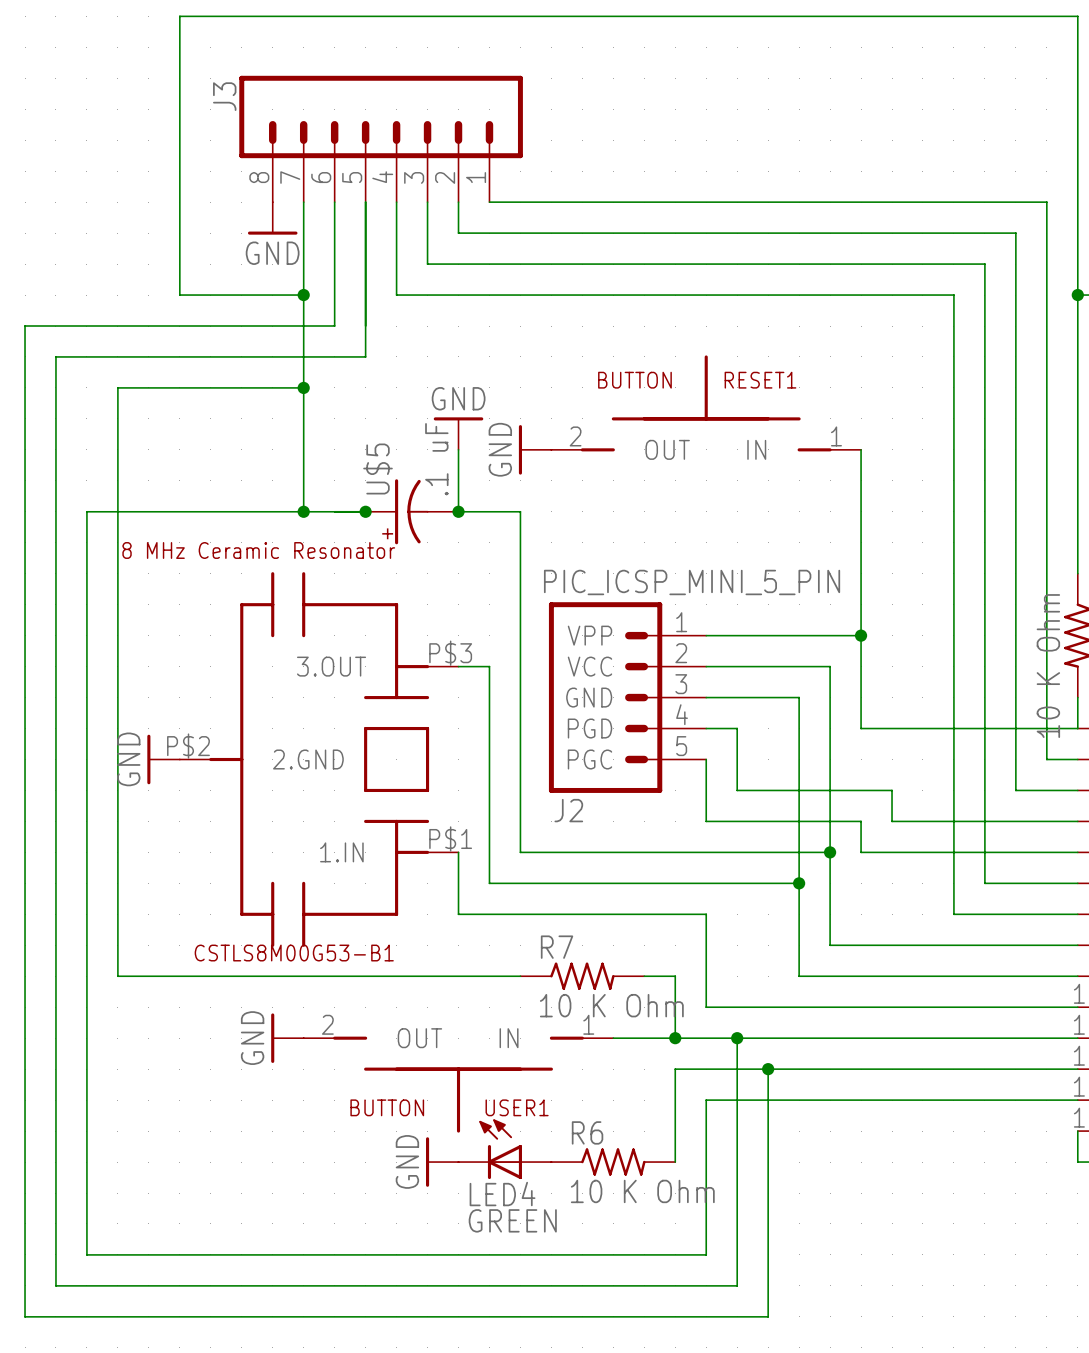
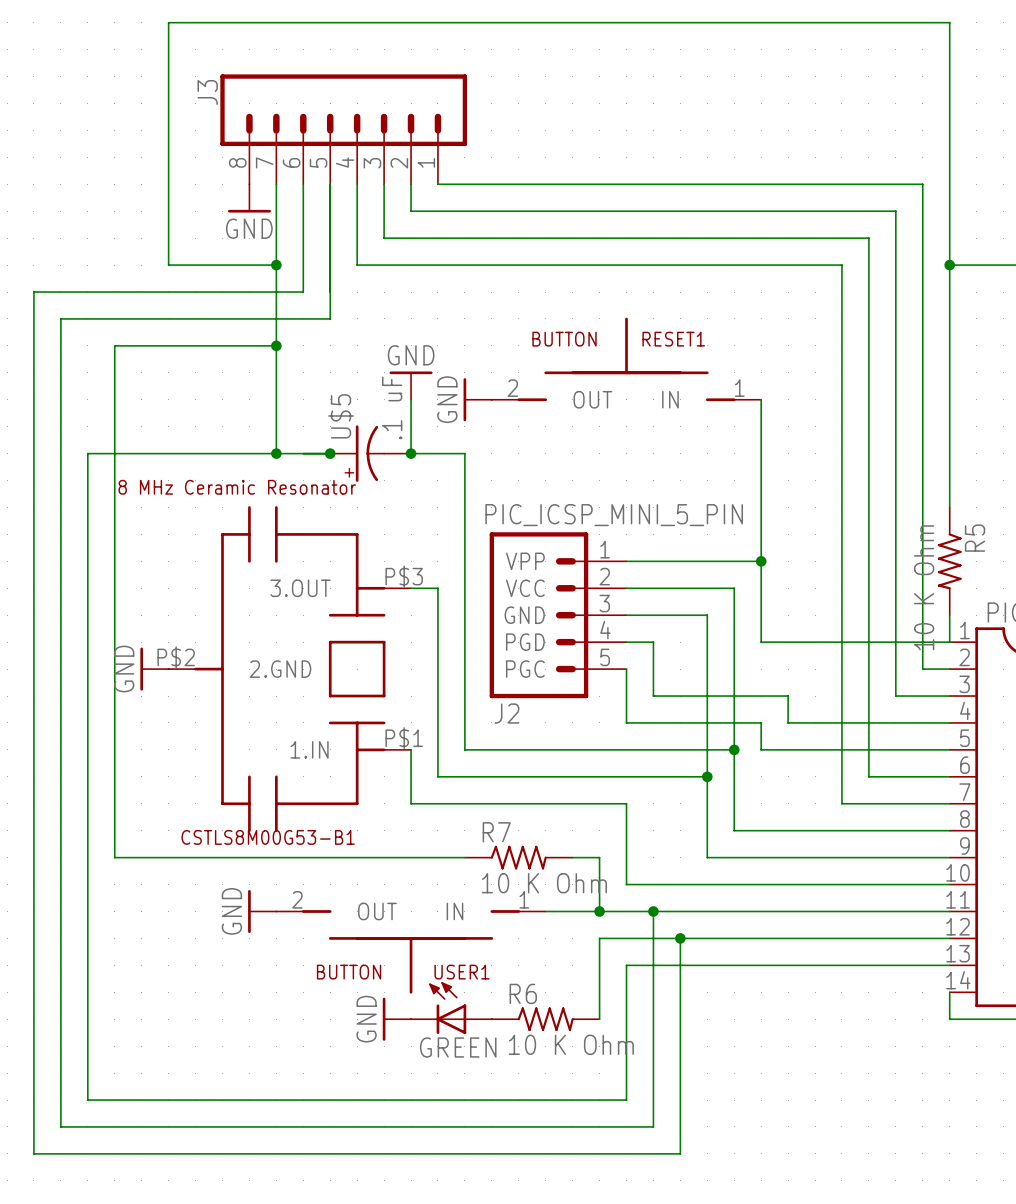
LED4 name: LED4 (502, 1194) -> GREEN (458, 1047)
LED4 value: GREEN (512, 1220) -> none

